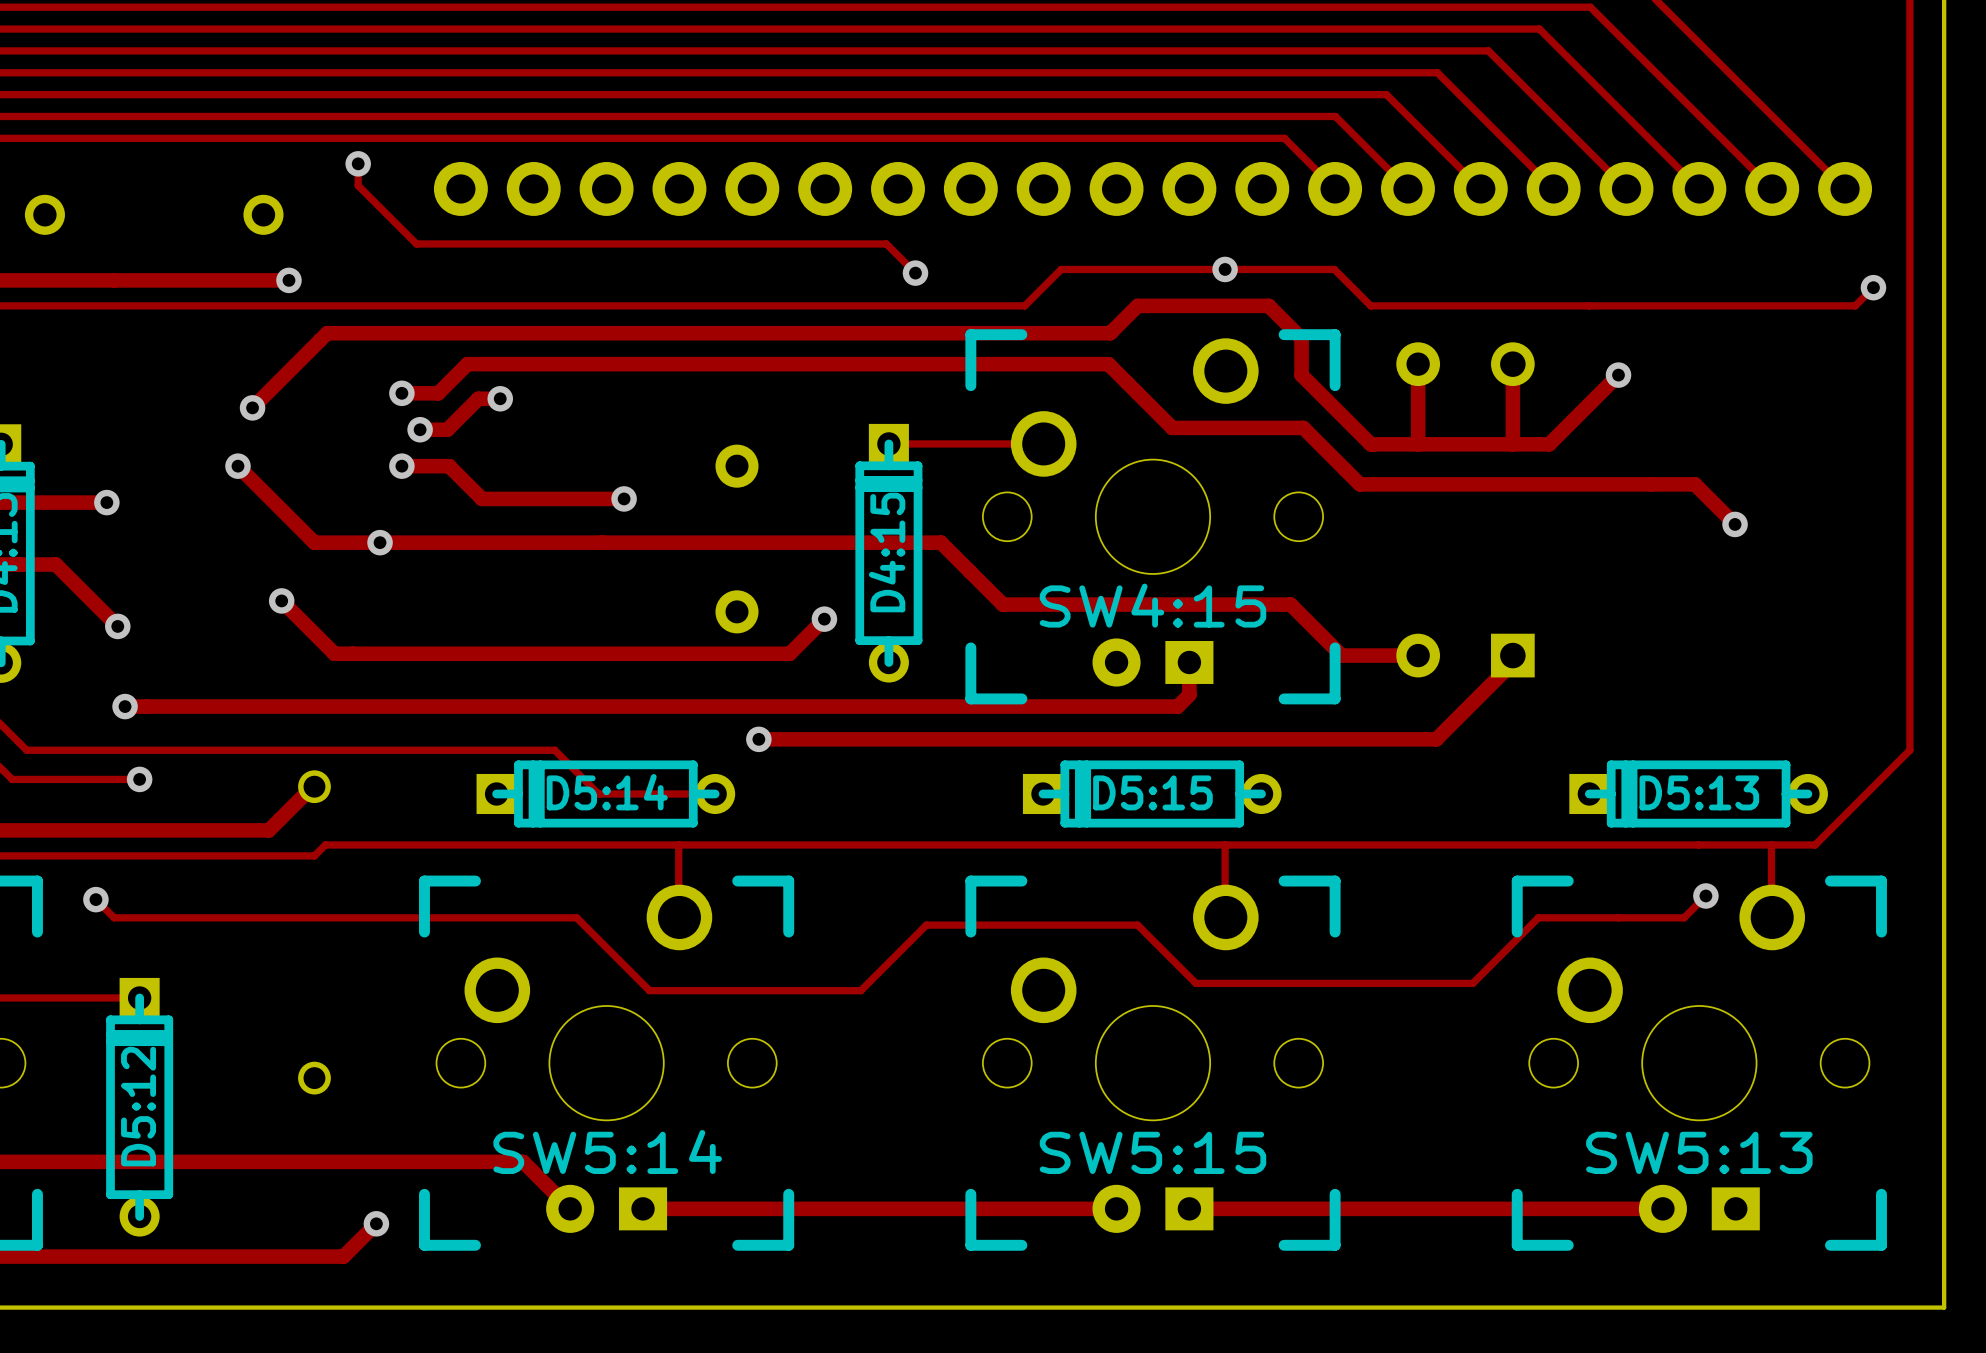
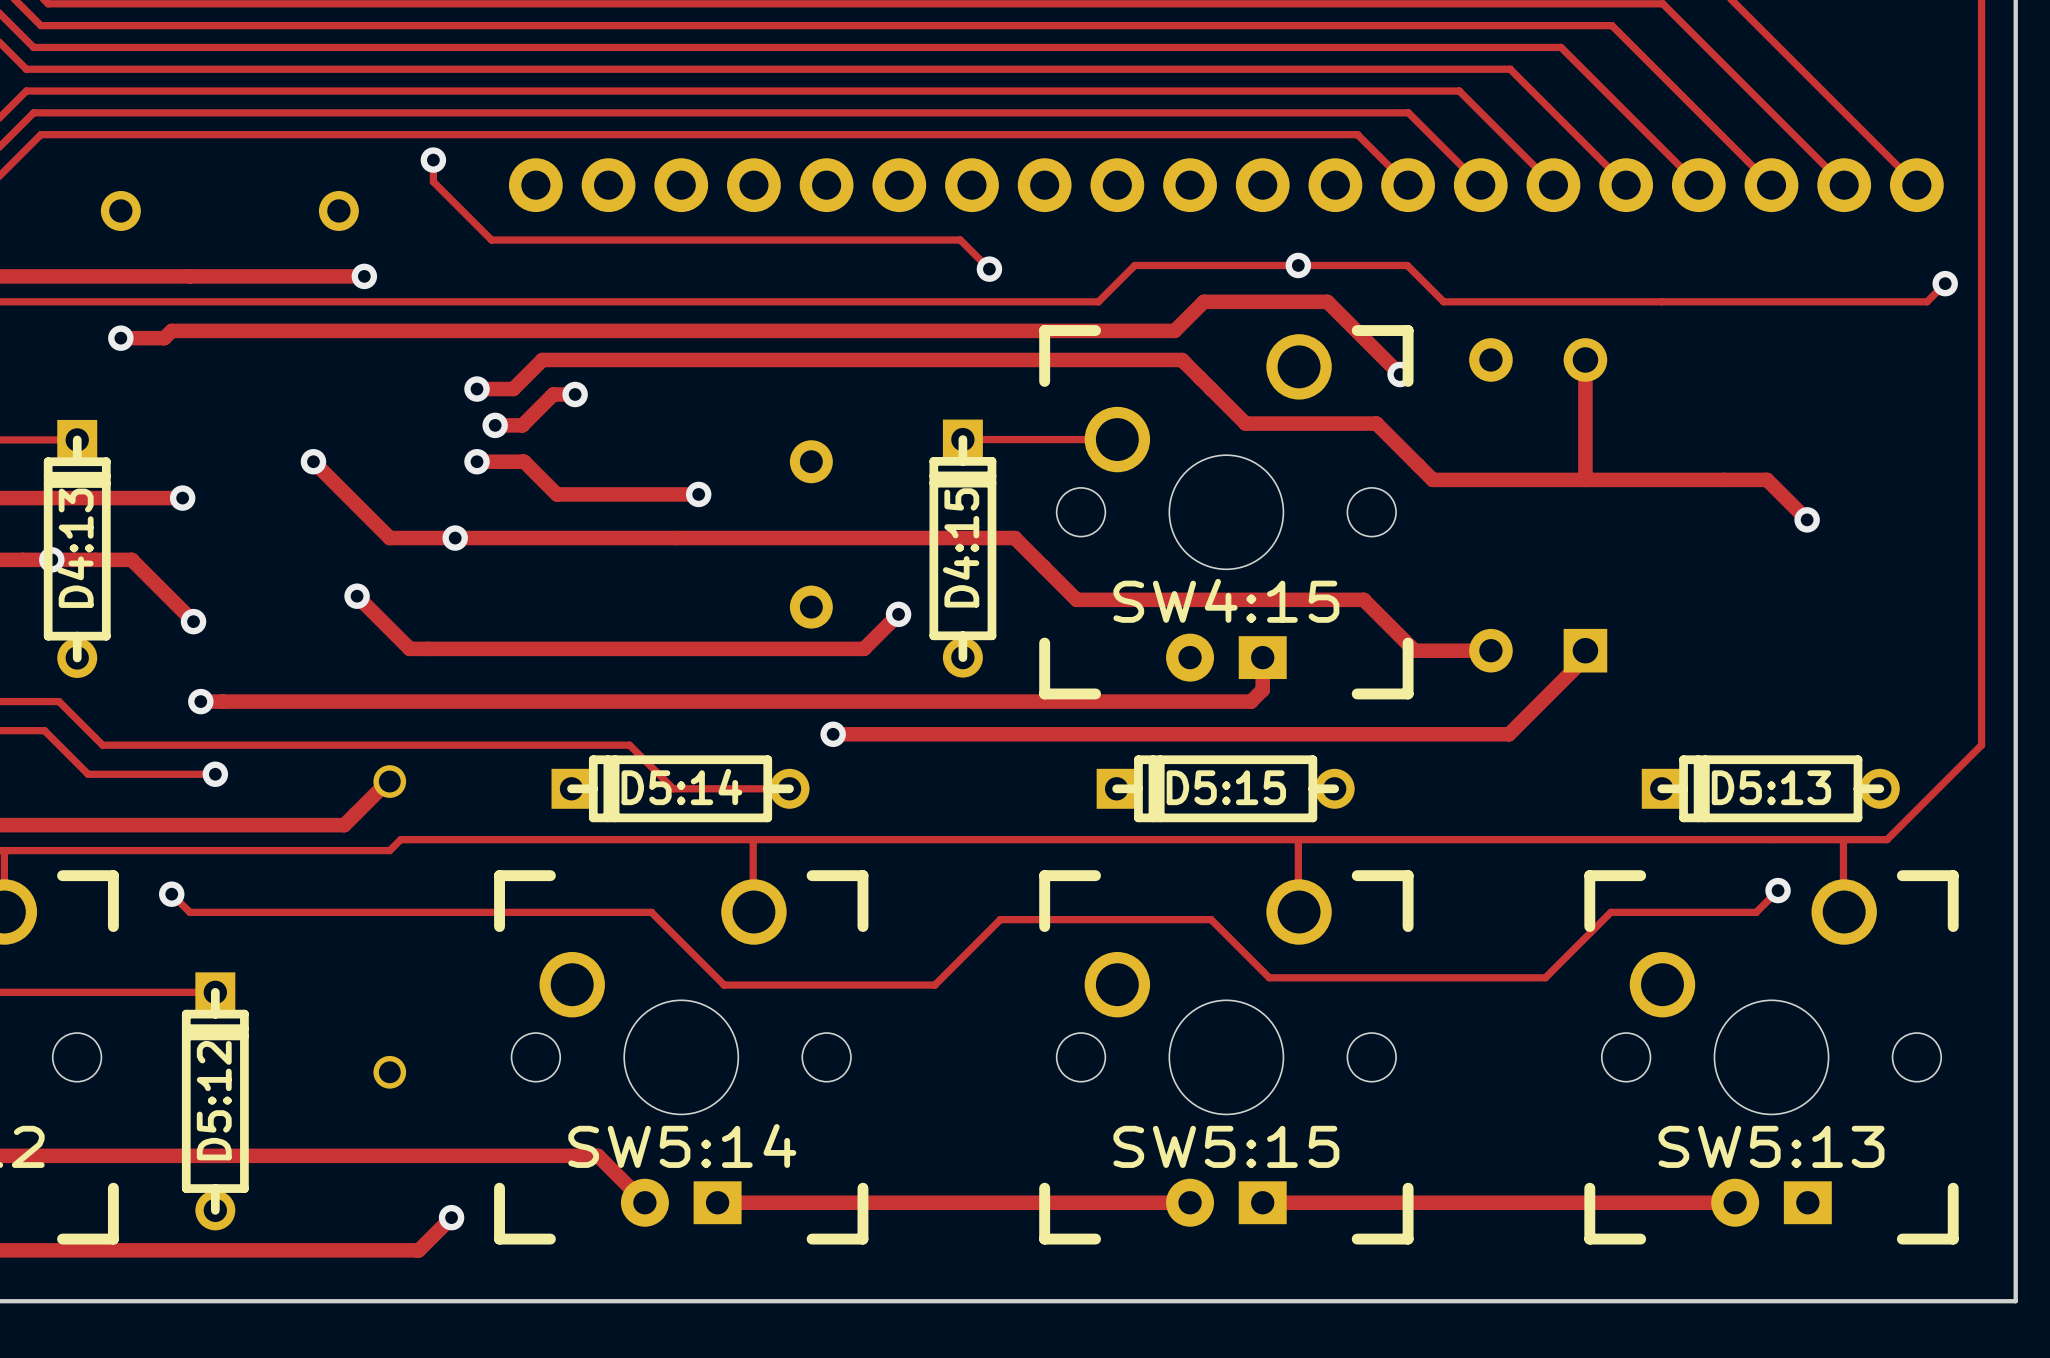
track: (1137, 305) (1110, 333) (327, 333) (252, 407) -> (1211, 301) (1203, 301) (1174, 330) (171, 330) (164, 338) (120, 338)
track: (1254, 305) (1268, 305) (1301, 338) (1301, 375) (1370, 444) (1549, 444) (1618, 375) -> (1327, 301) (1400, 374)
via: none -> (120, 338)
track: (1418, 364) (1418, 444) -> none
via: (1618, 375) -> none
via: none -> (1400, 374)
via: (252, 407) -> none
track: none -> (1585, 439) (1585, 479)

